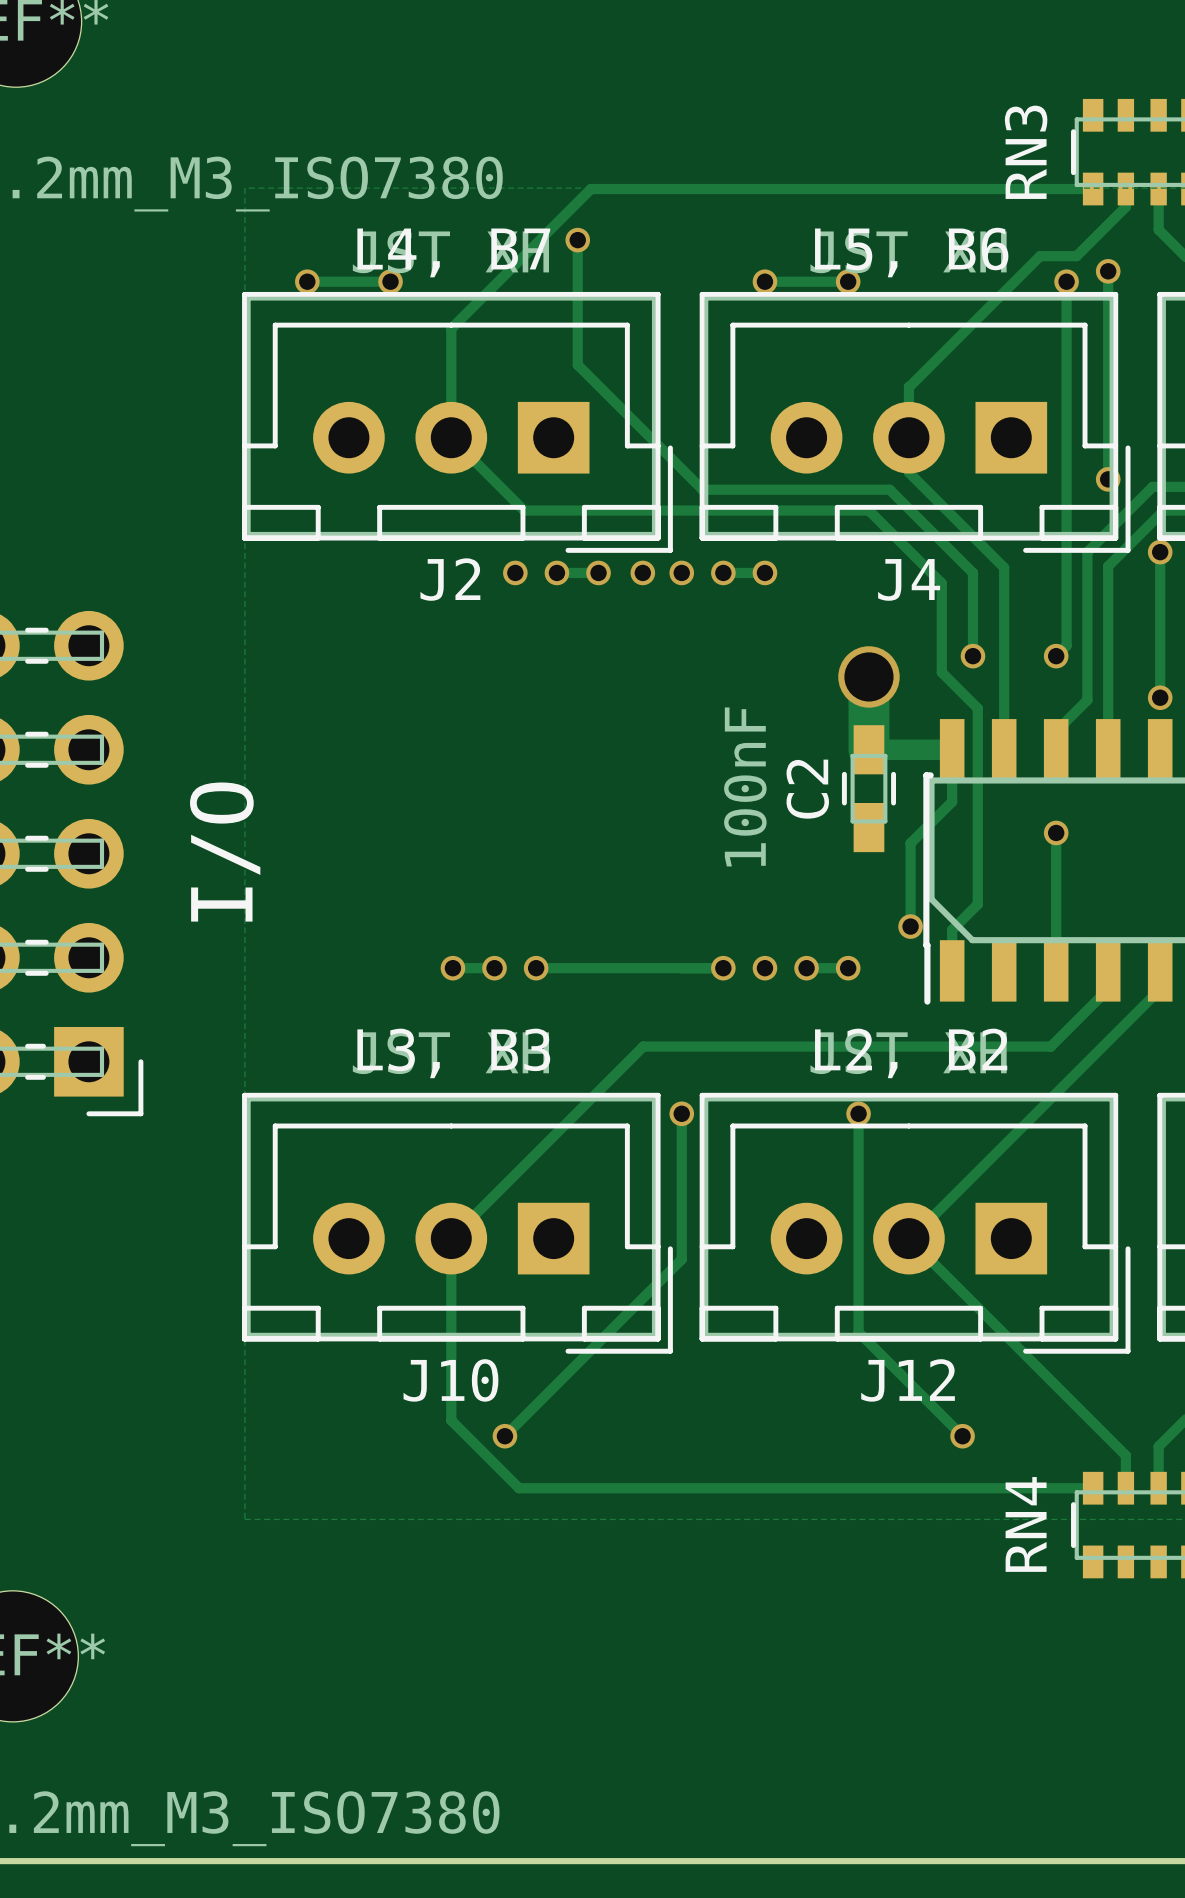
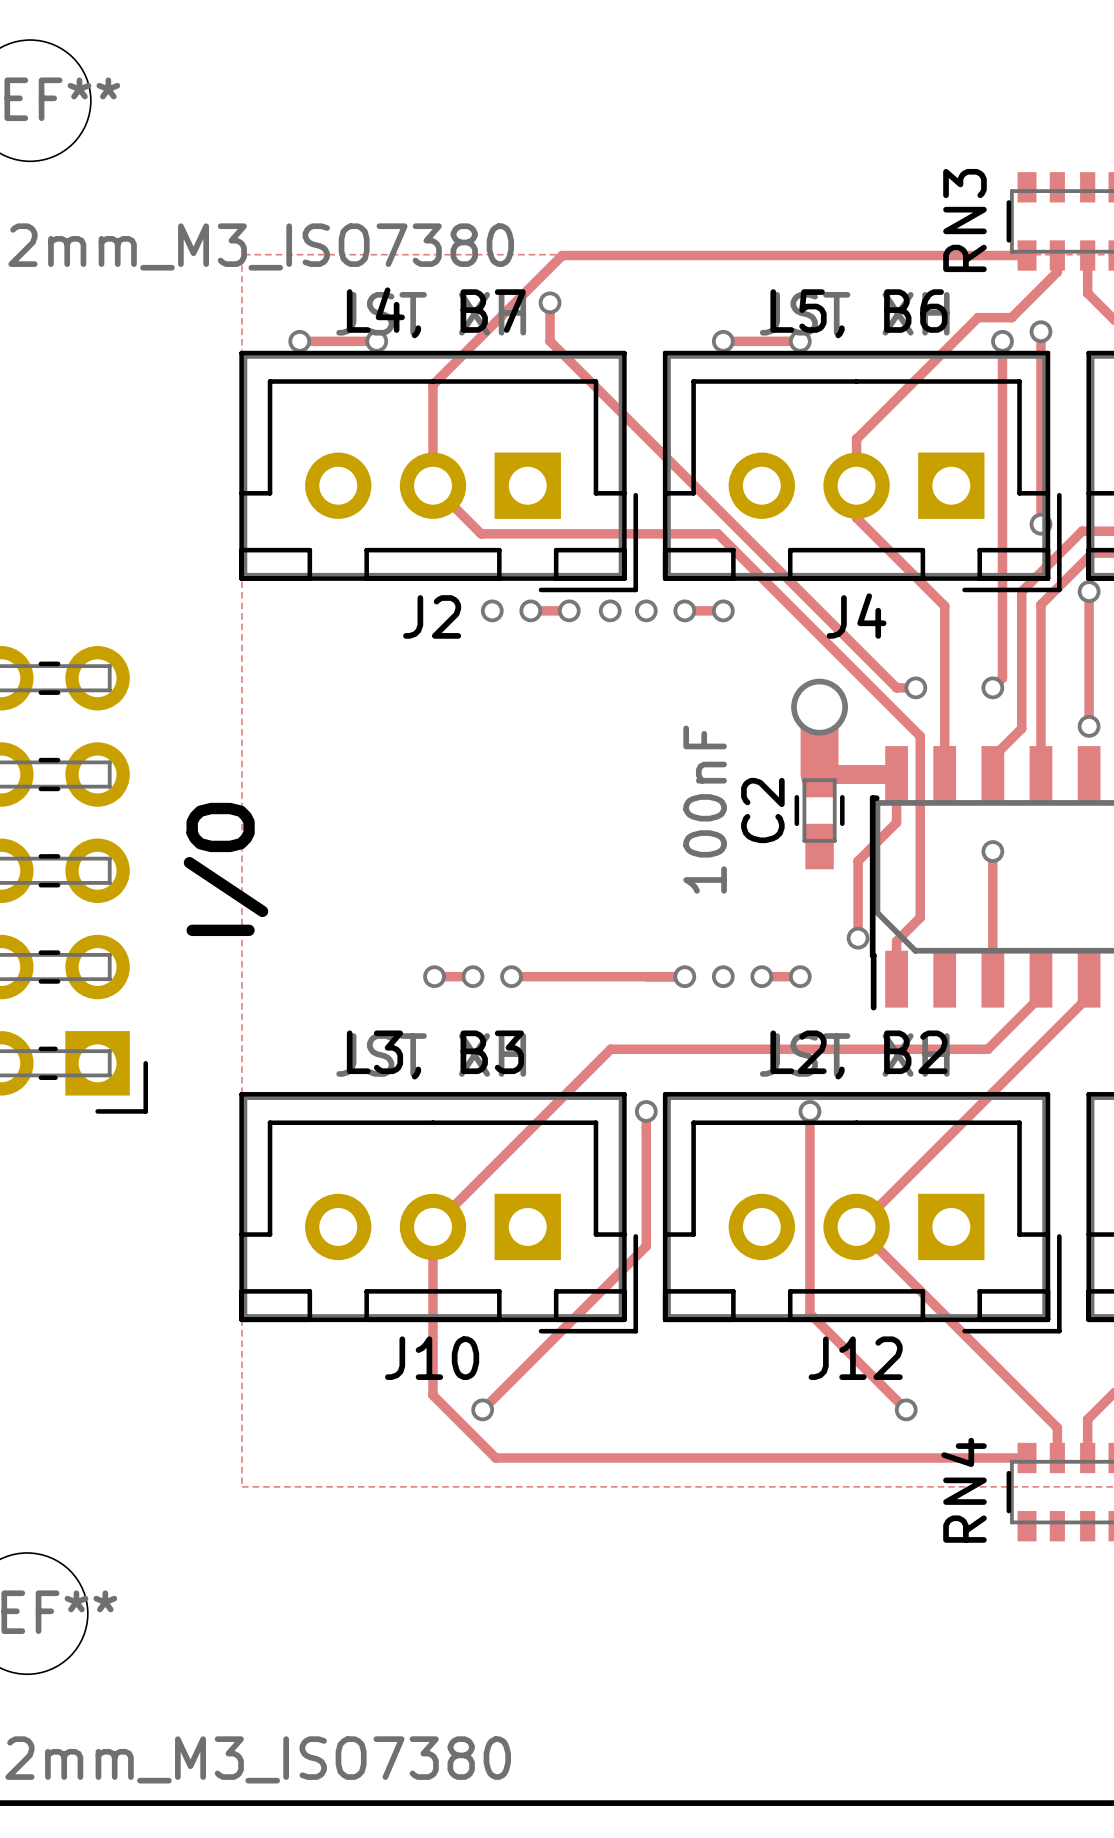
track: (577, 281) (577, 364) (702, 489) -> (481, 533) (665, 533)
track: none -> (550, 341) (896, 687) (915, 687)
track: (503, 489) (524, 510) (868, 510) (941, 583) (941, 672) -> none
track: (759, 489) (889, 489) (972, 572) (972, 656) -> (717, 533) (886, 702)

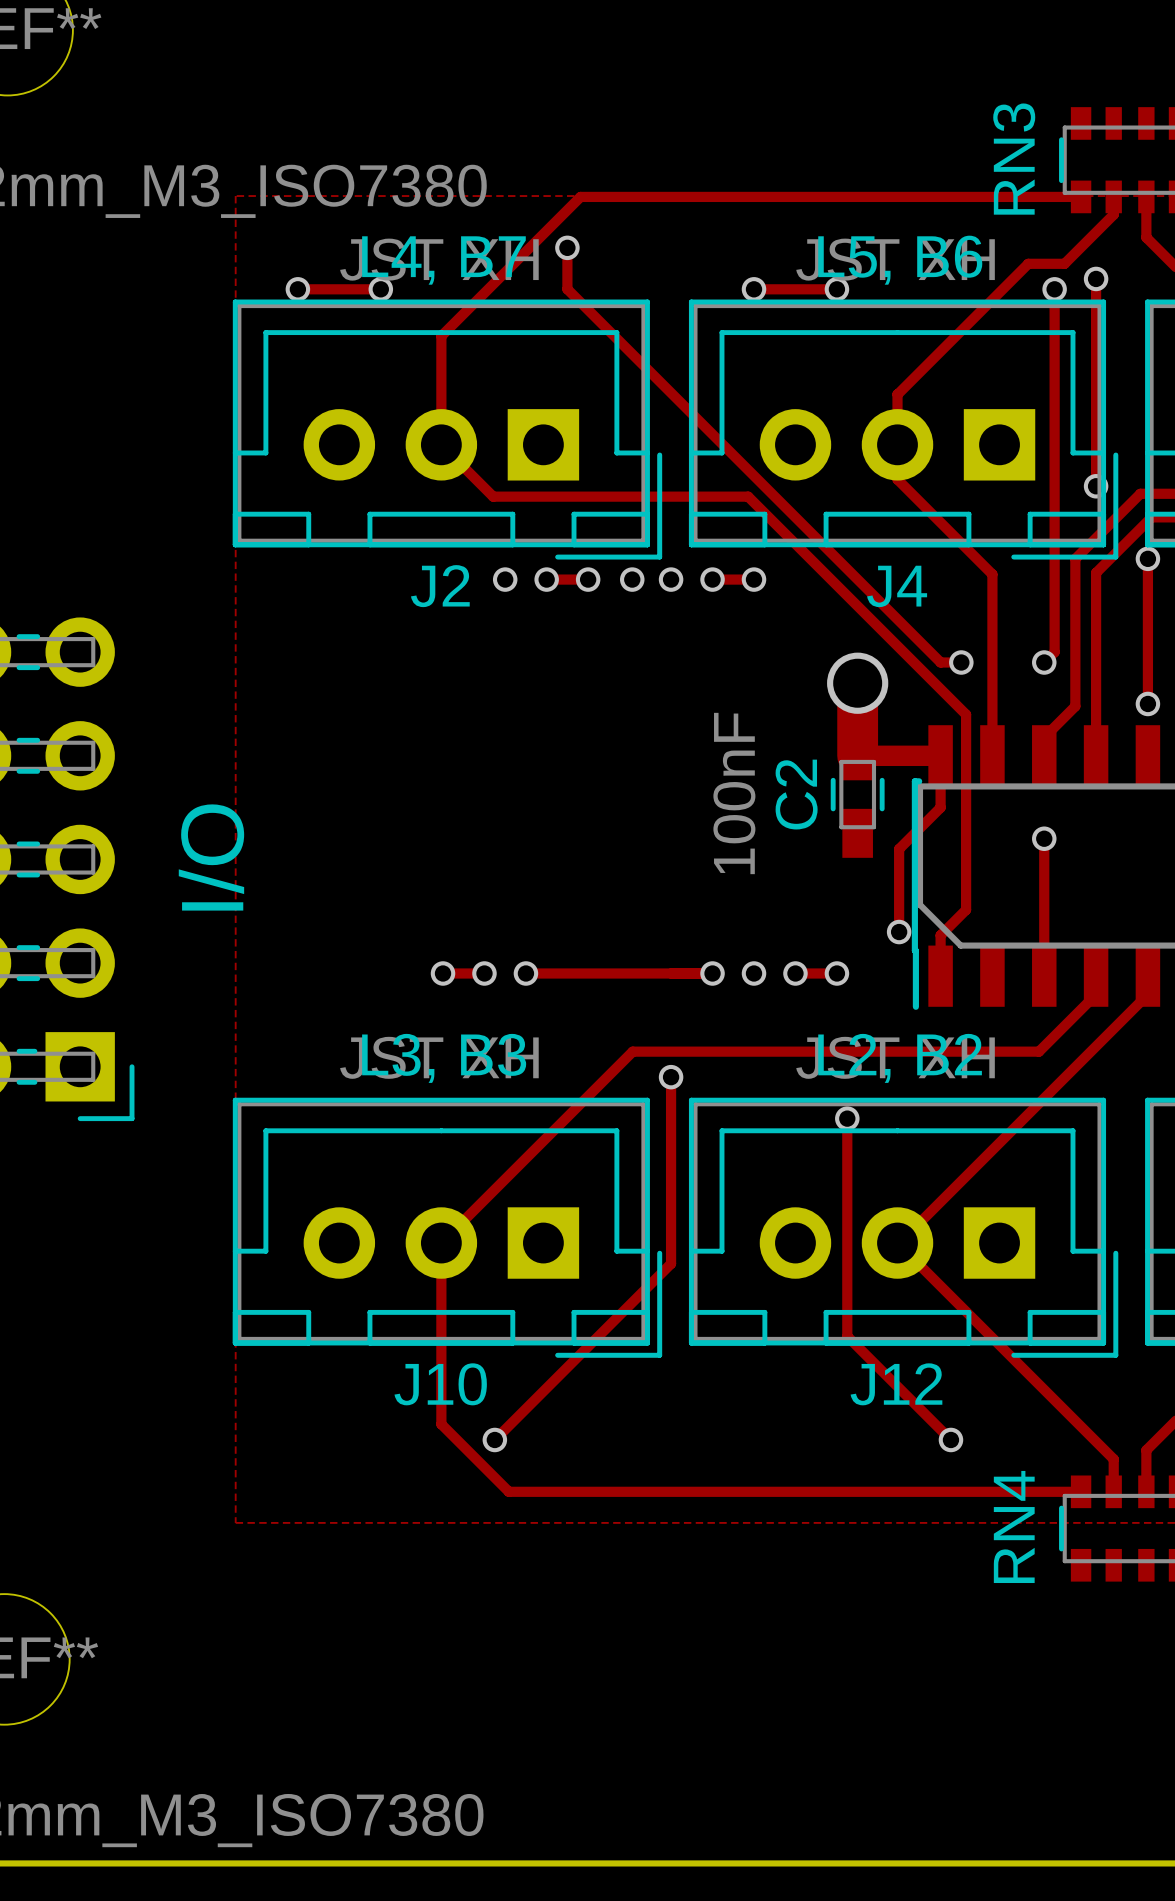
track: none -> (671, 1077) (671, 1118)
via position: (646, 1111) -> (671, 1077)

